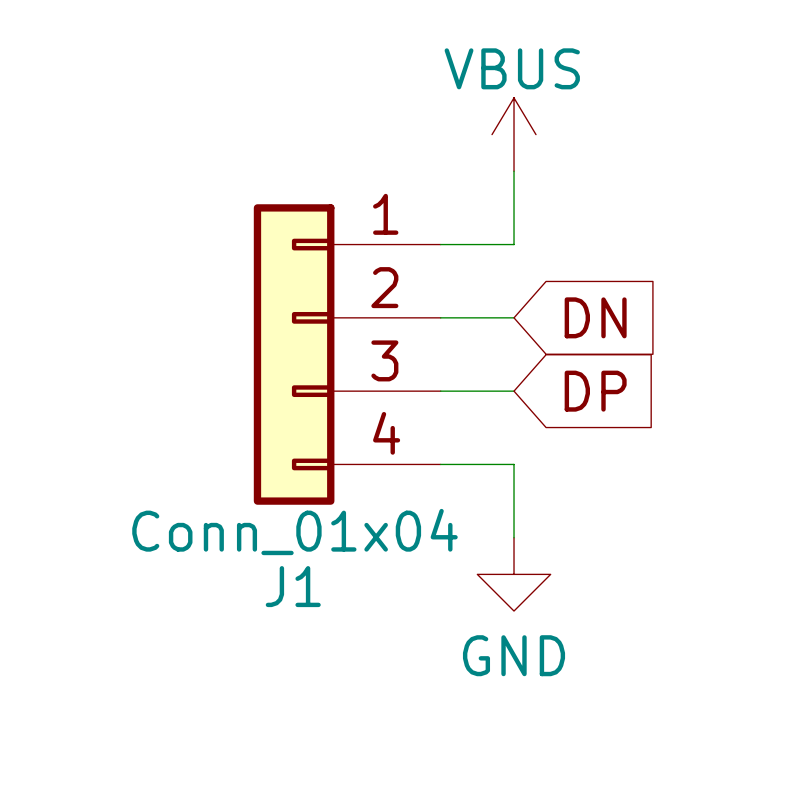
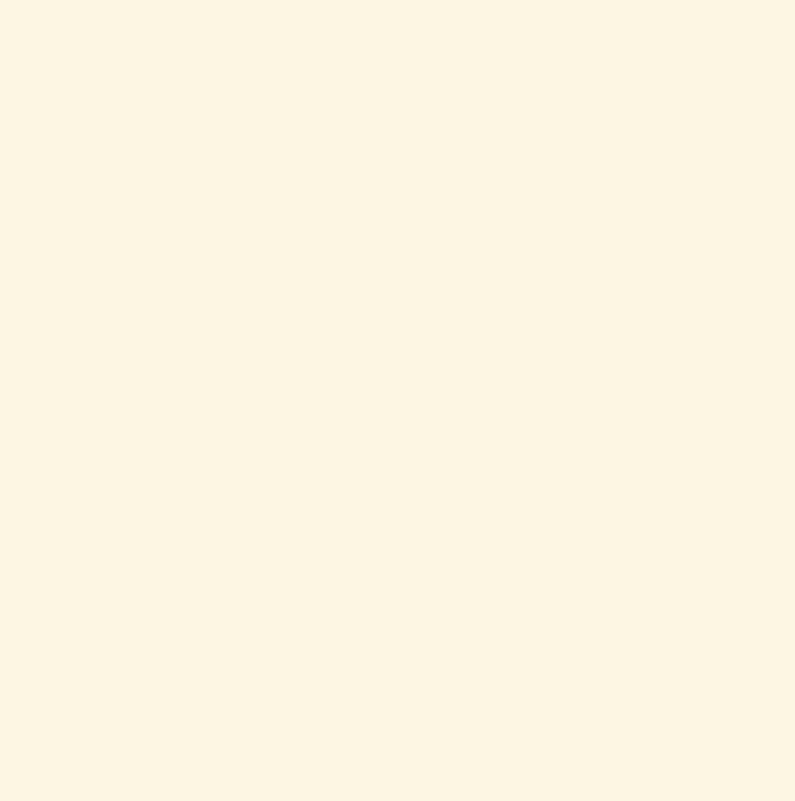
power symbol: VBUS (514, 134) -> none
wire: (514, 171) (514, 244) (440, 244) -> none
wire: (440, 317) (514, 317) -> none
global label: DN (595, 317) -> none
J1: Conn_01x04 (347, 354) -> none
wire: (440, 391) (514, 391) -> none
global label: DP (595, 391) -> none
wire: (440, 464) (514, 464) (514, 537) -> none
power symbol: GND (514, 574) -> none

